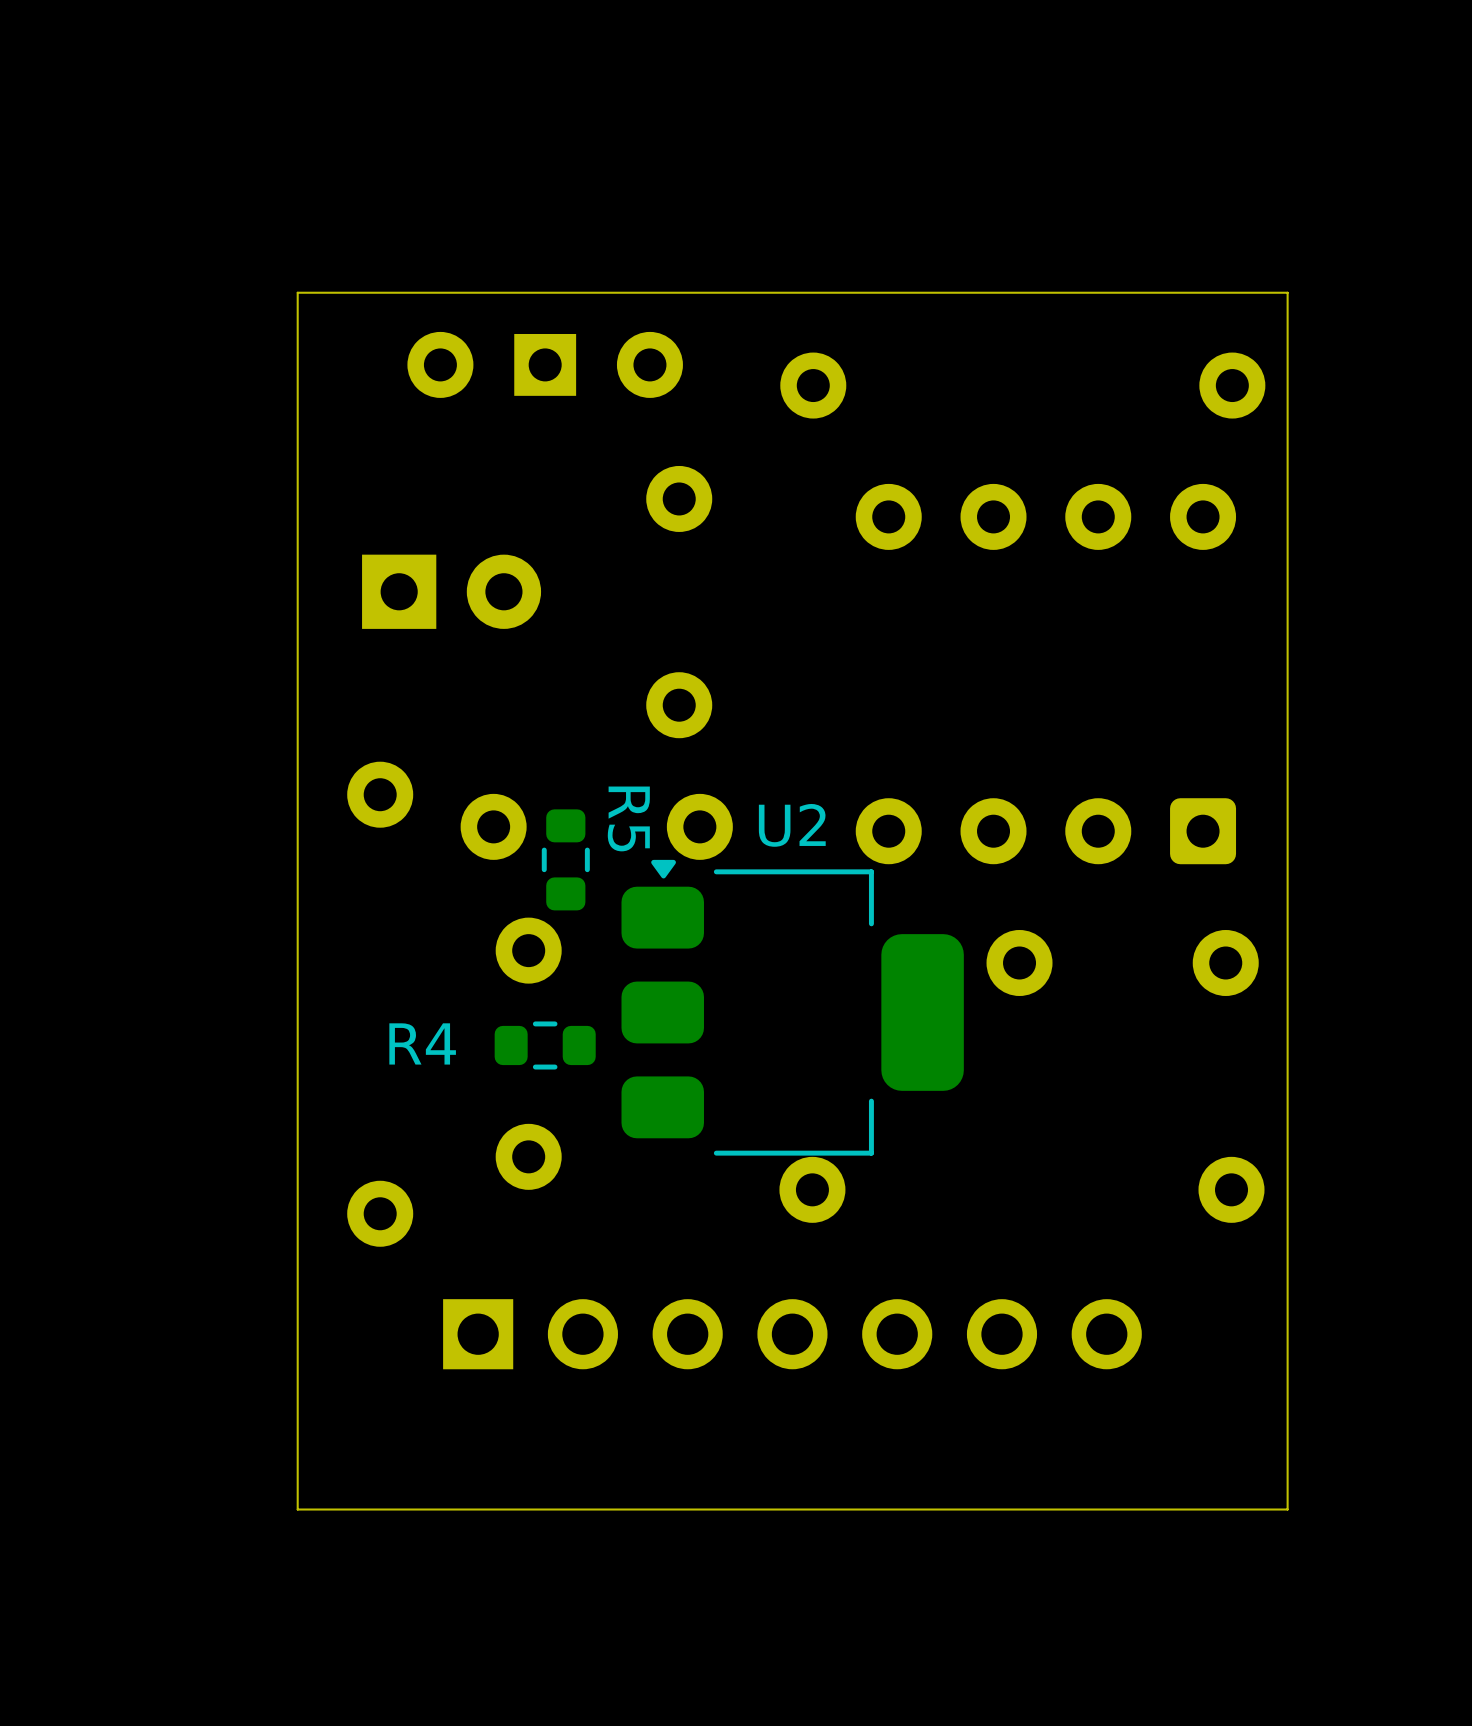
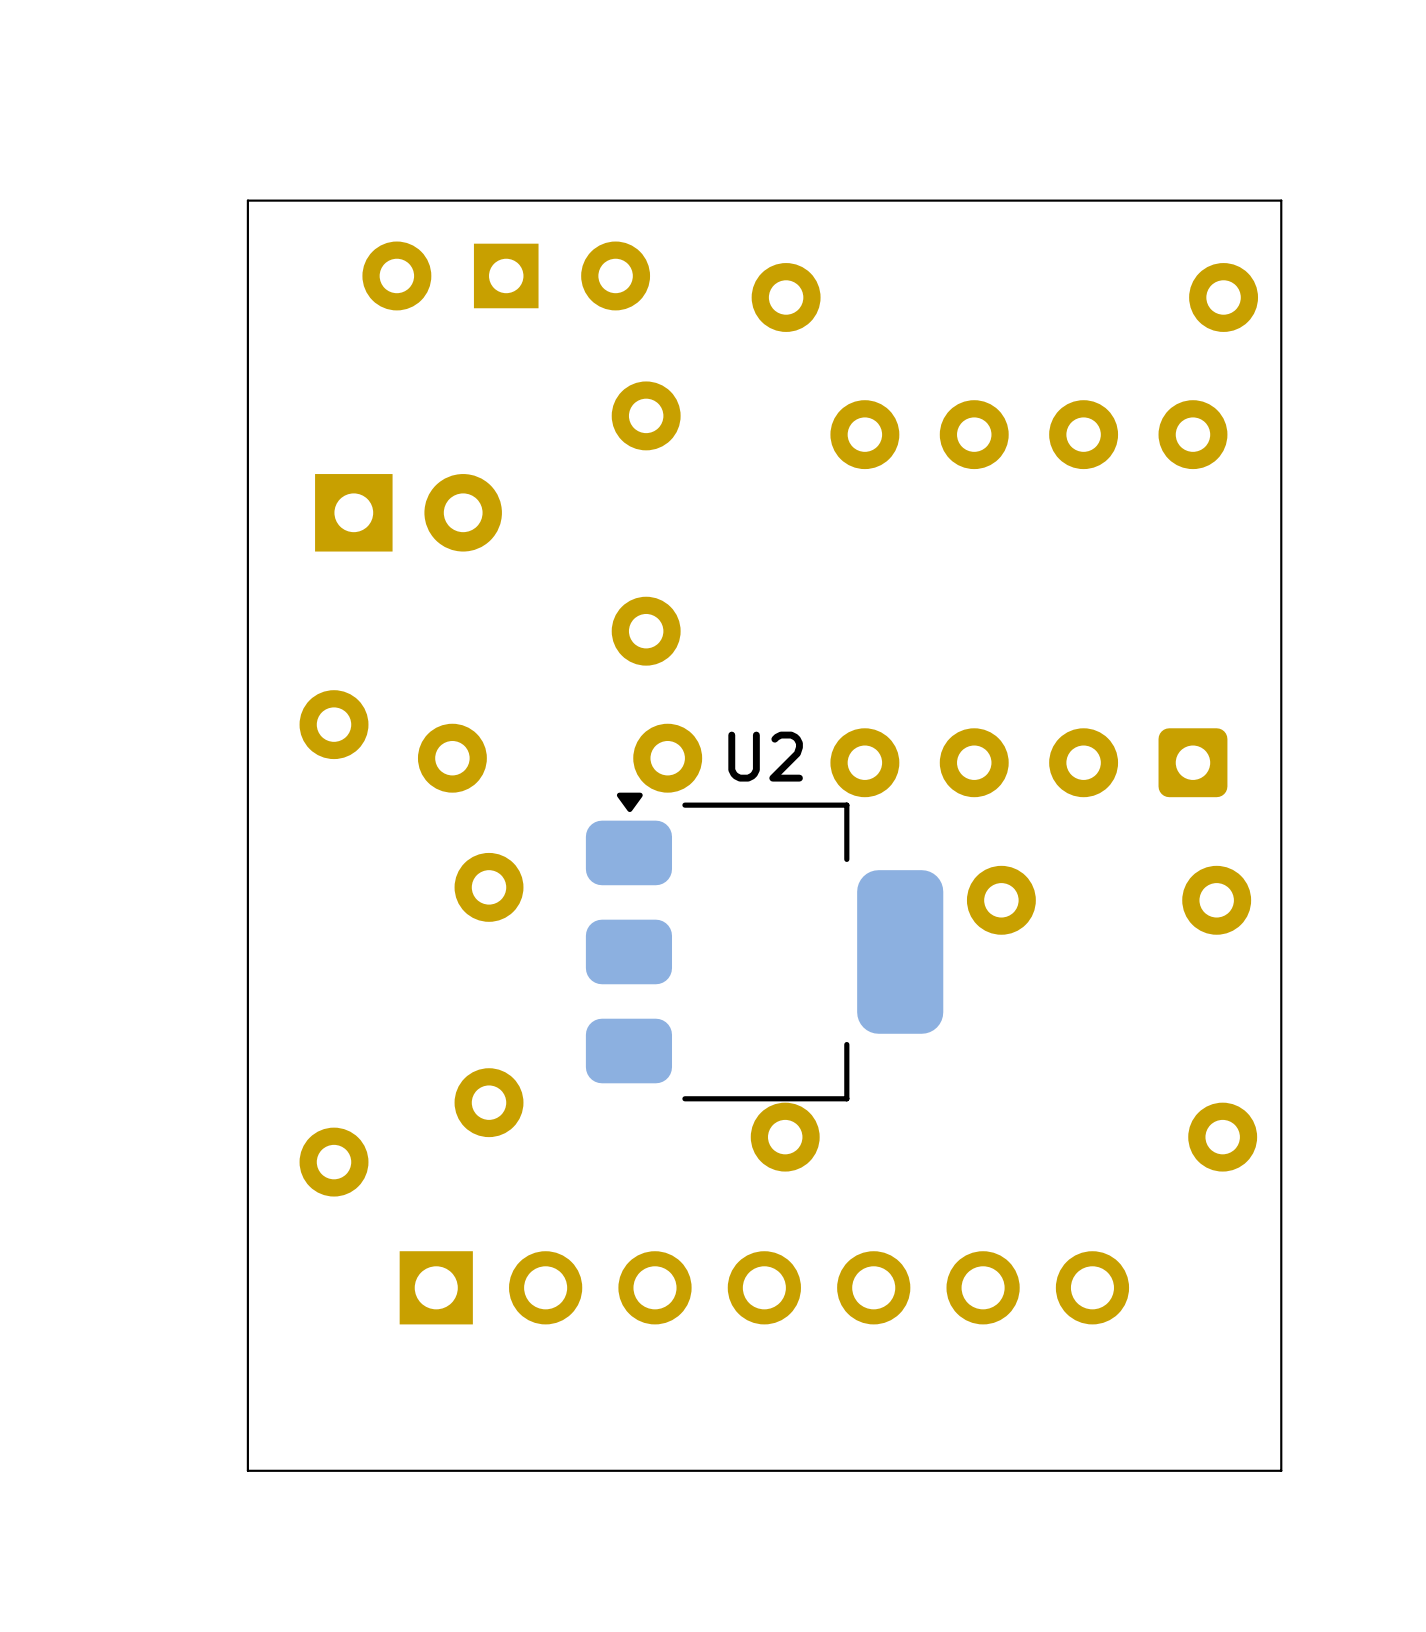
R5: (565, 859) -> none
R4: (545, 1045) -> none

